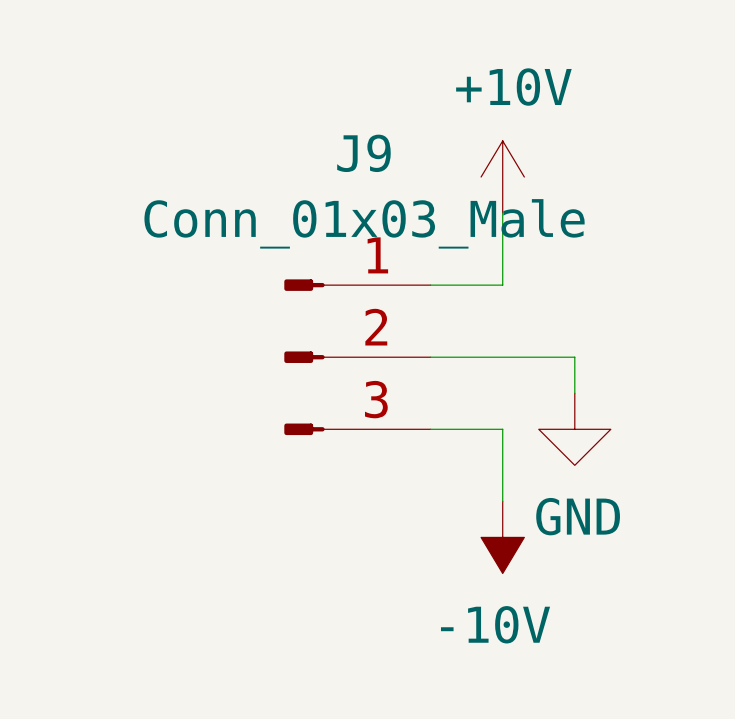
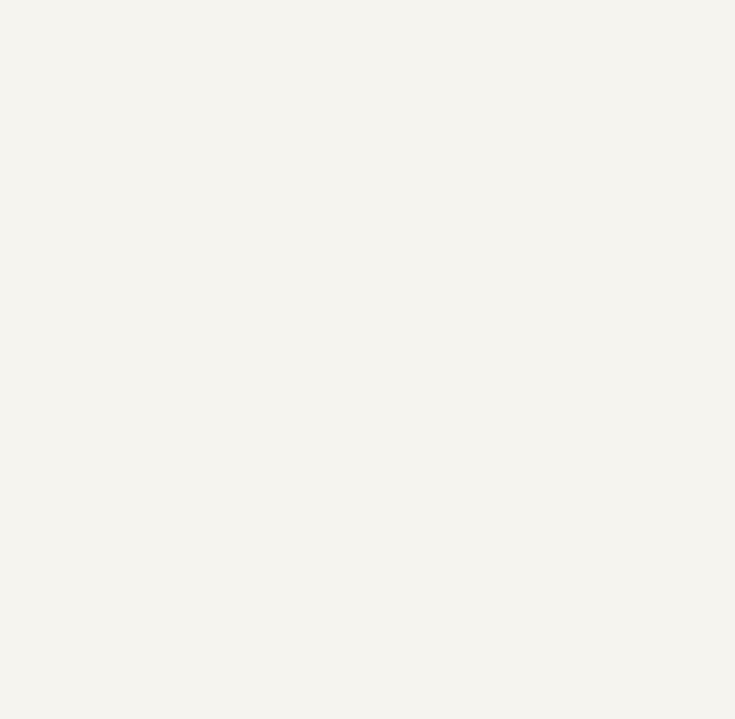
power symbol: +10V (502, 177) -> none
wire: (502, 213) (502, 285) (430, 285) -> none
J9: Conn_01x03_Male (357, 357) -> none
wire: (430, 357) (574, 357) (574, 393) -> none
wire: (430, 429) (502, 429) (502, 501) -> none
power symbol: GND (574, 429) -> none
power symbol: -10V (502, 537) -> none

